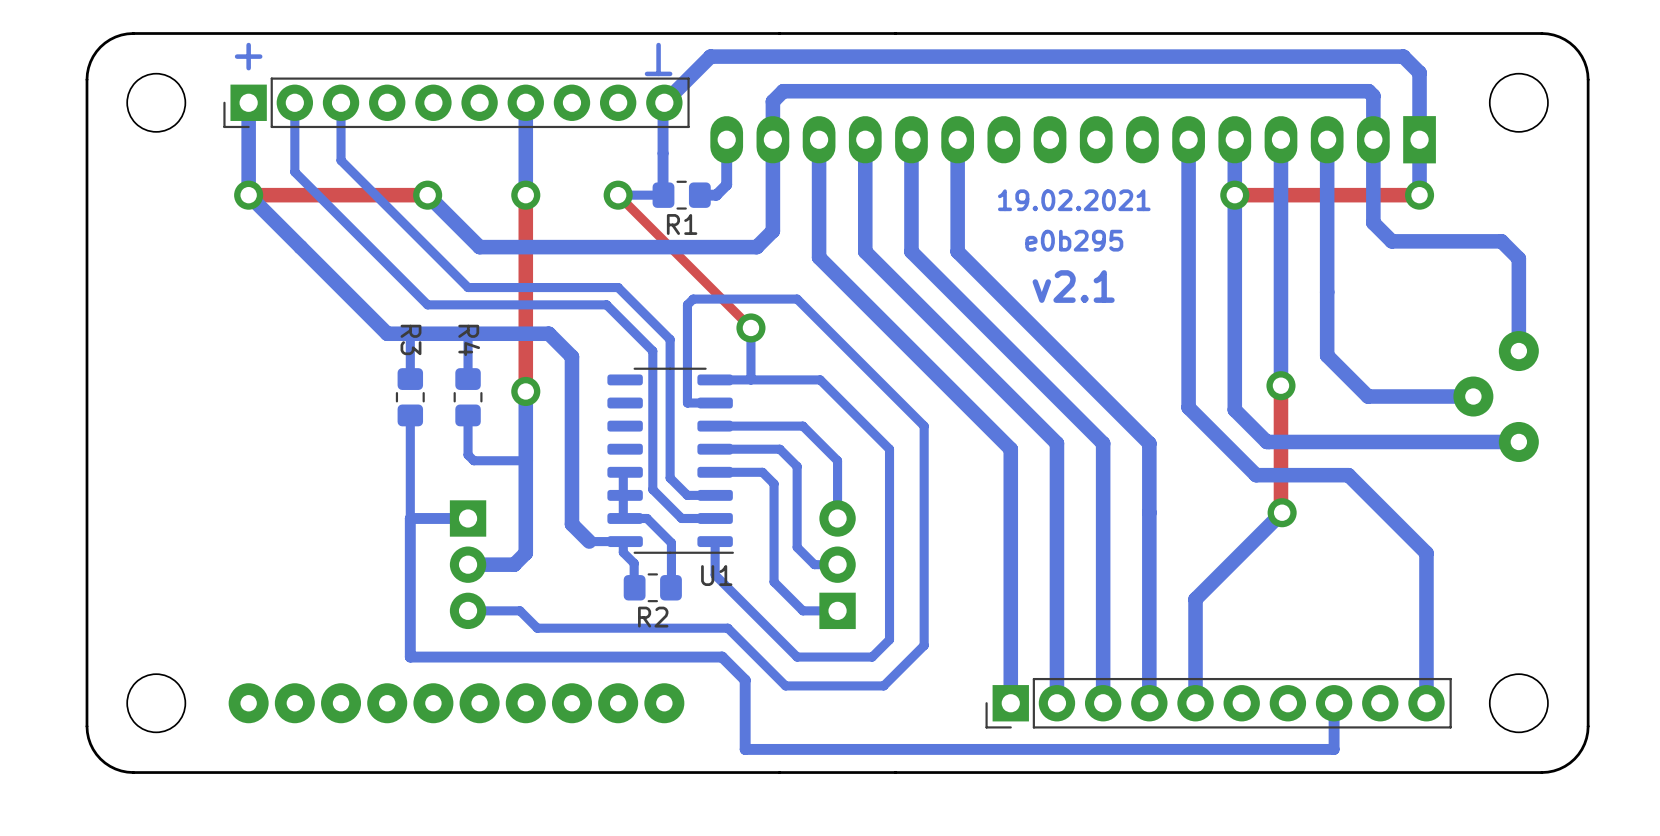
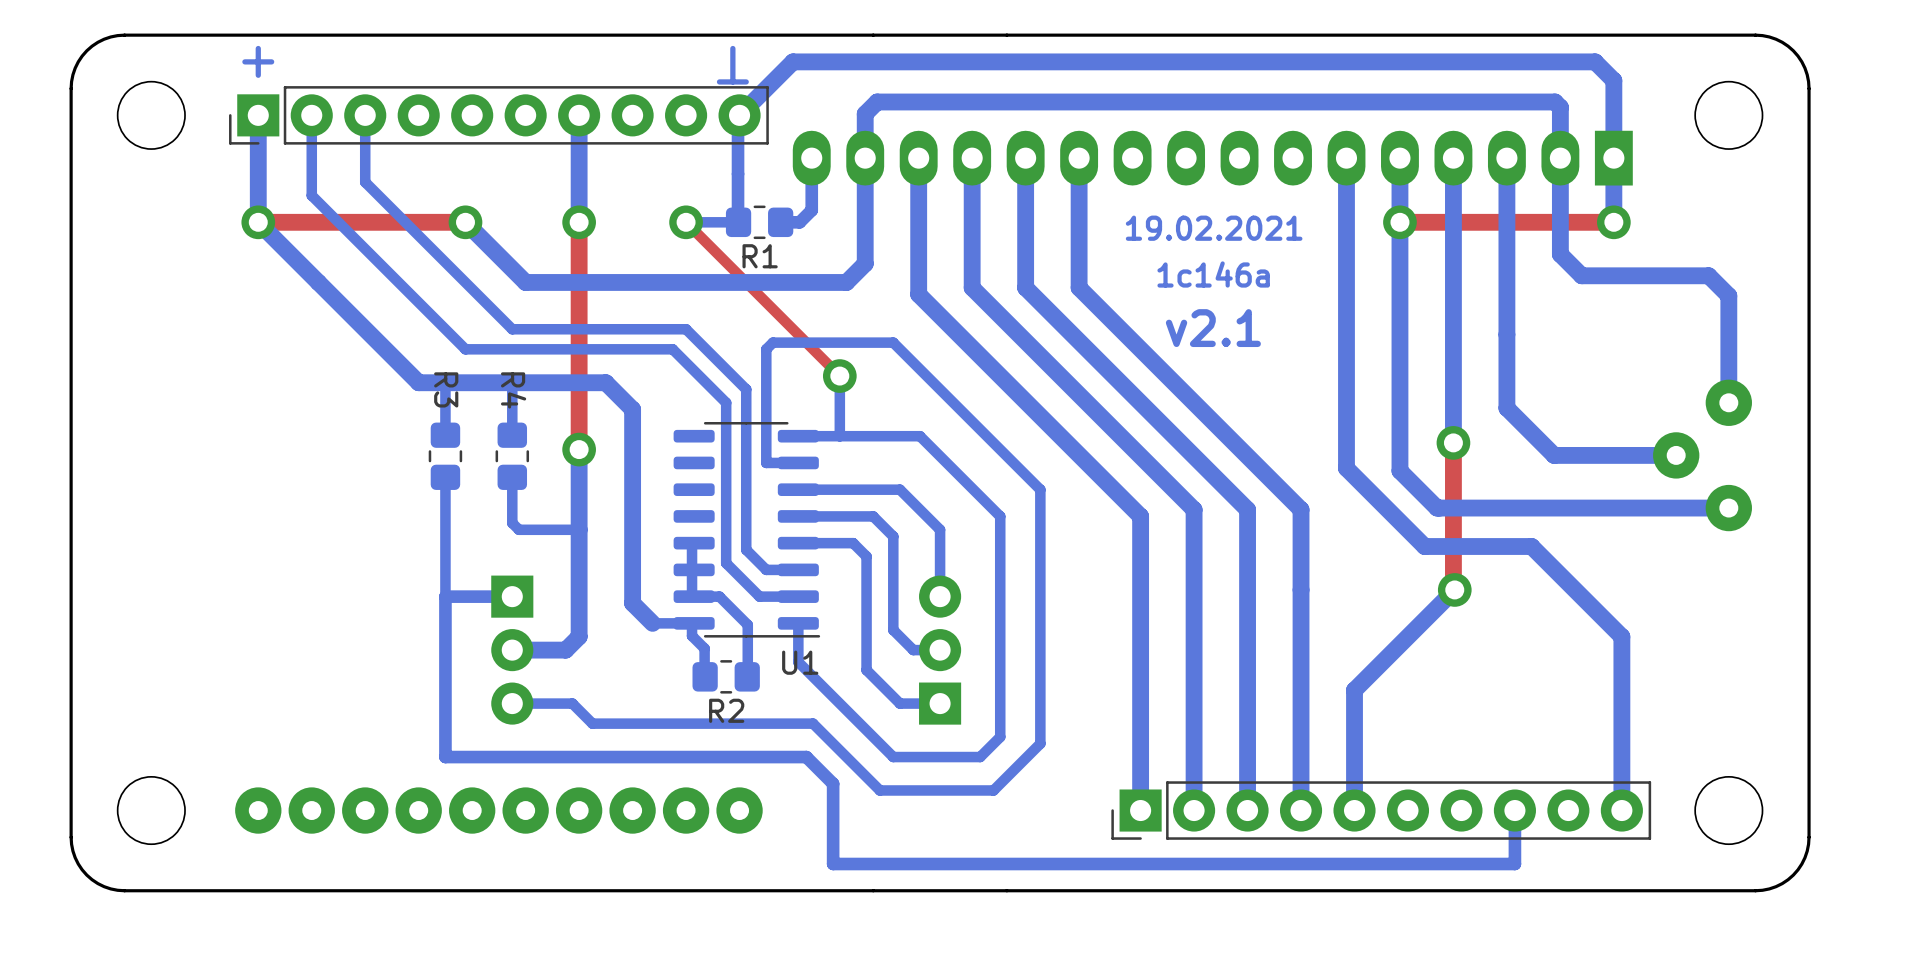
text: e0b295 (1074, 240) -> 1c146a (1213, 274)

